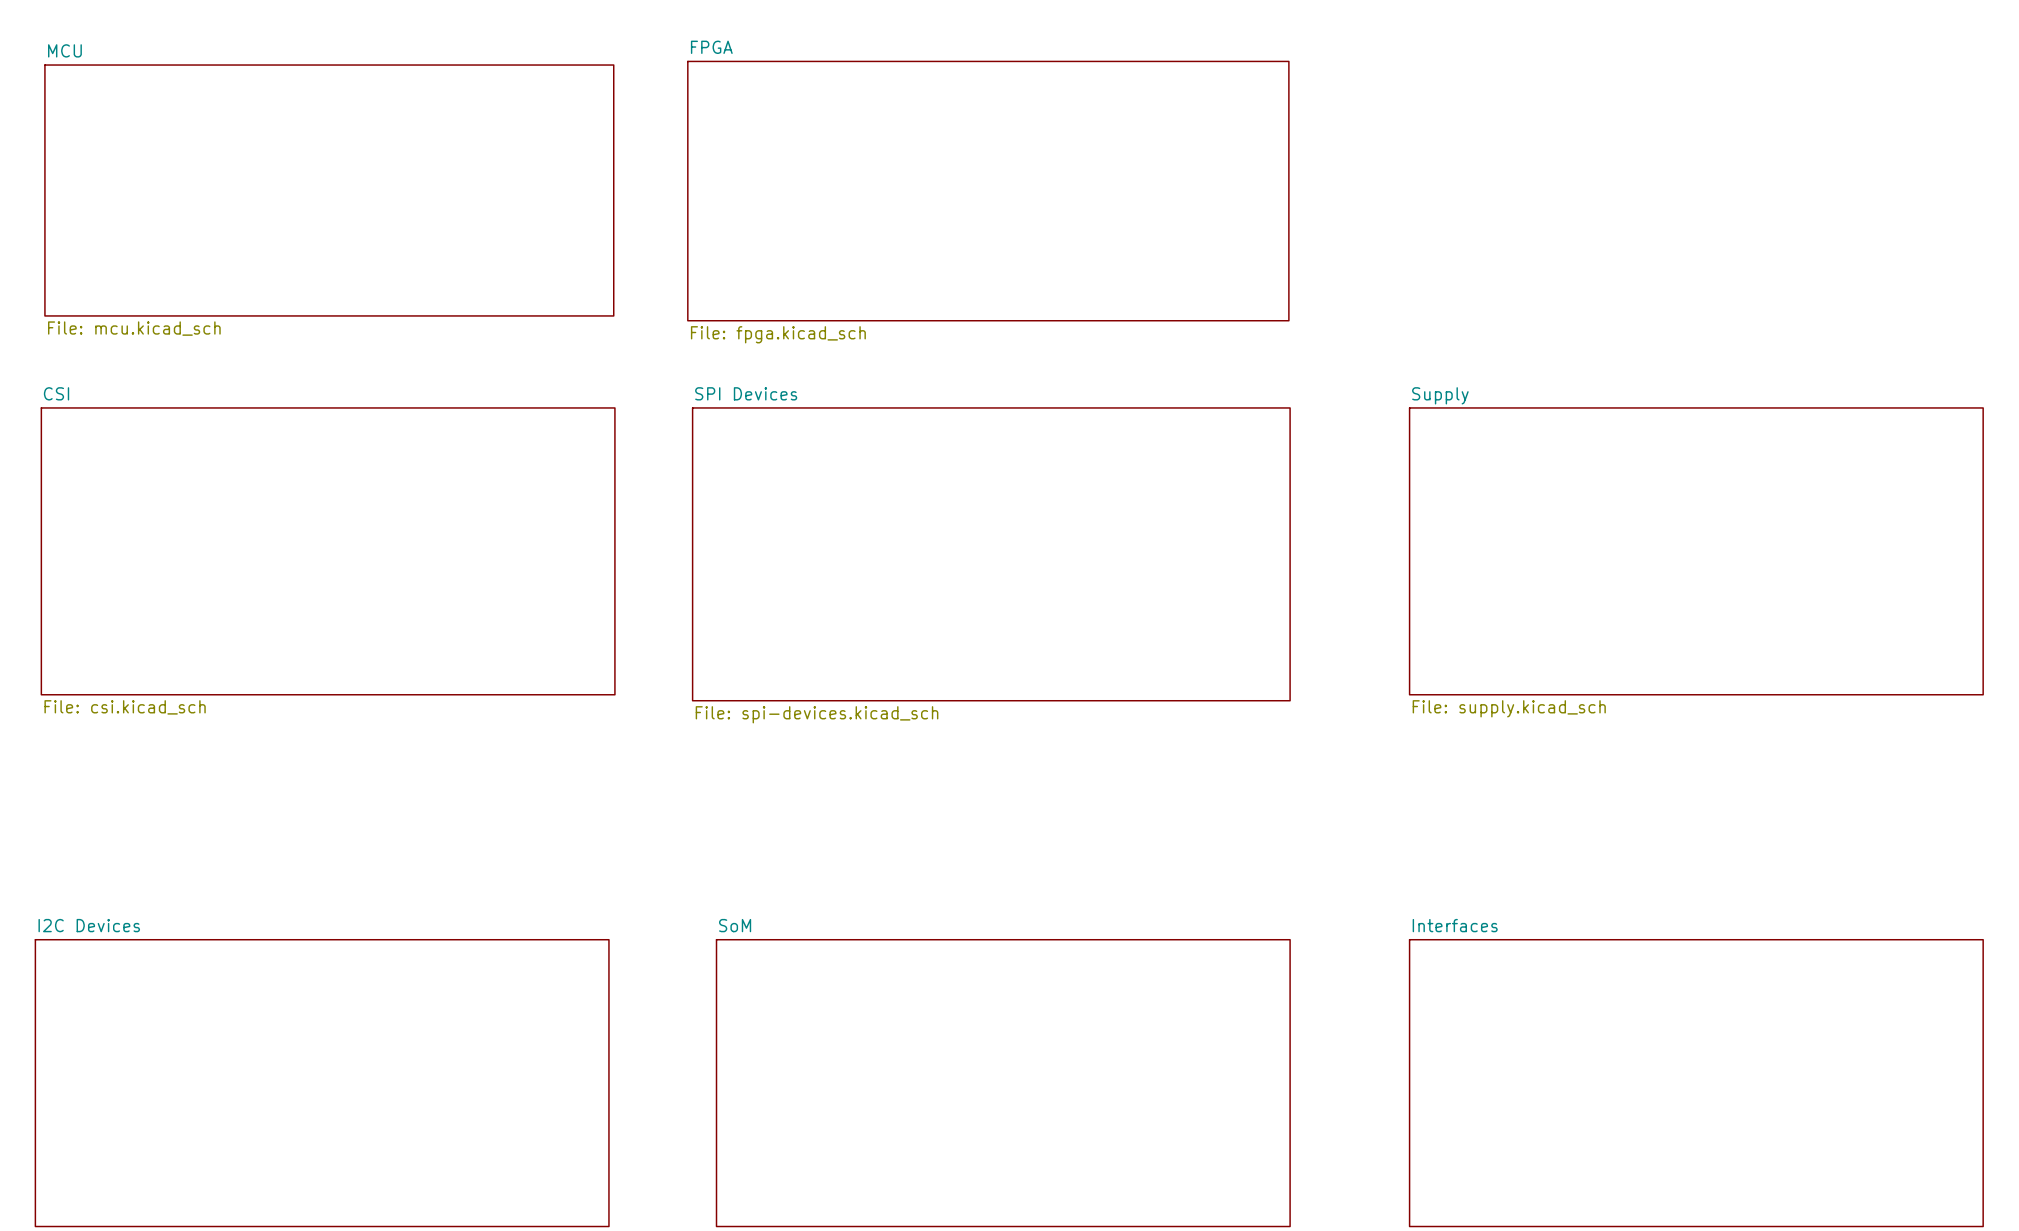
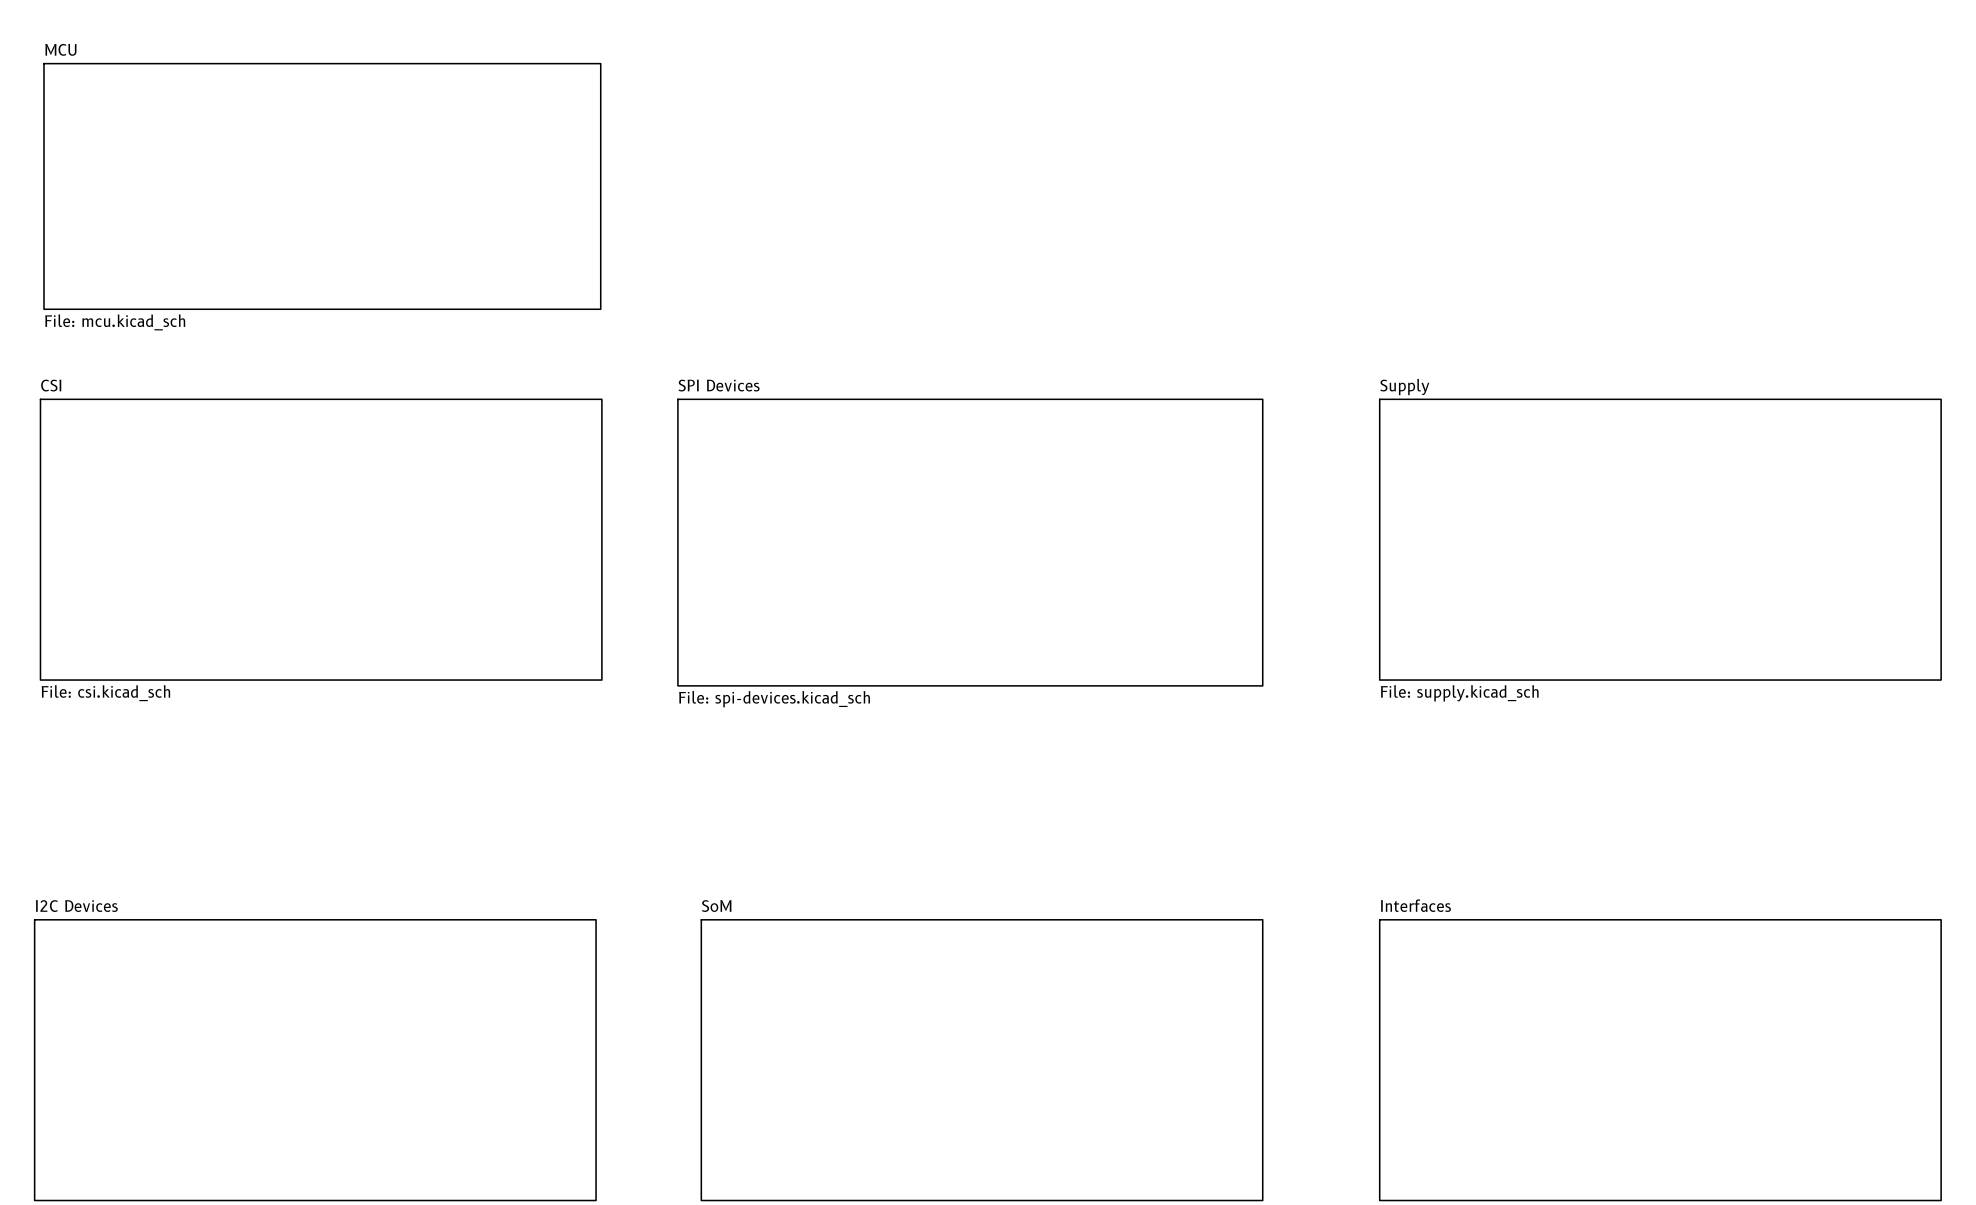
sheet FPGA: File: fpga.kicad_sch (988, 191) -> none

